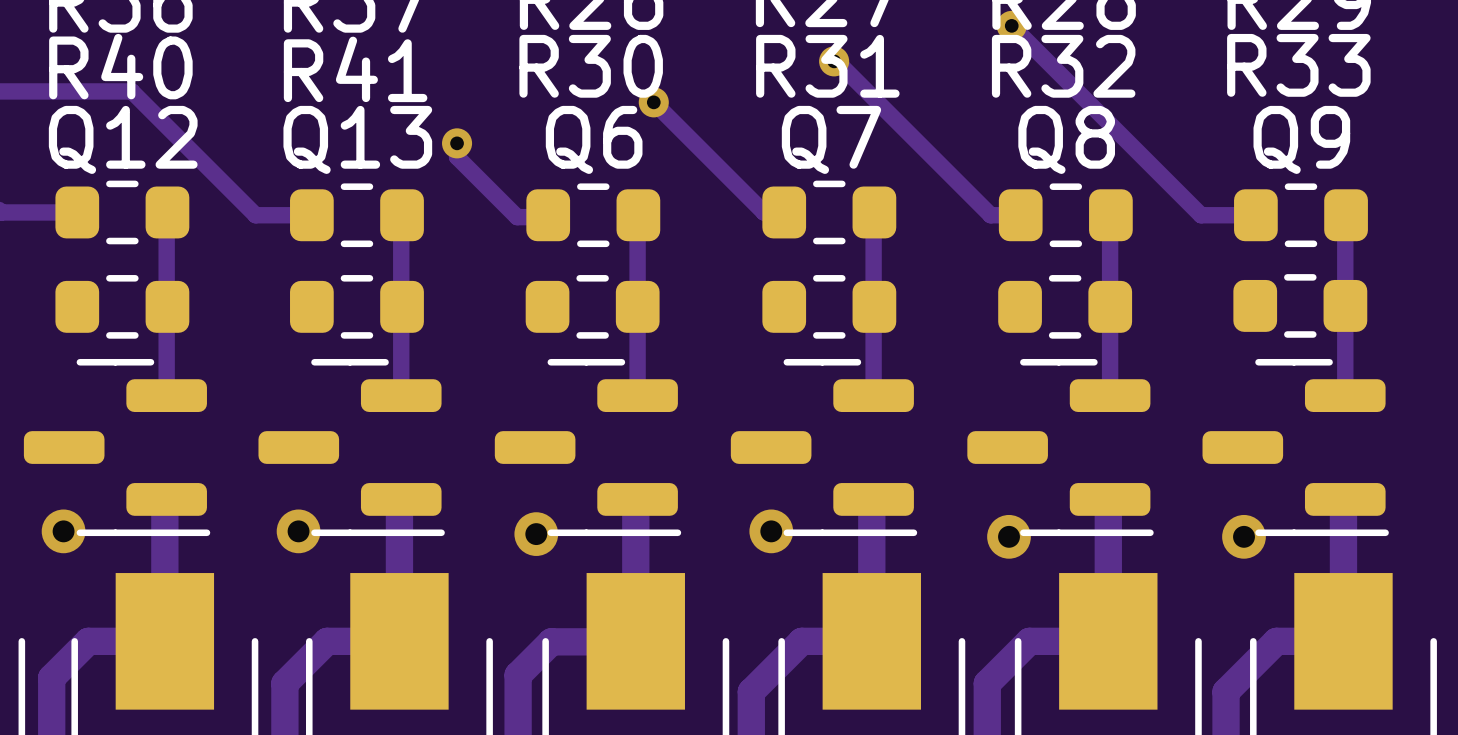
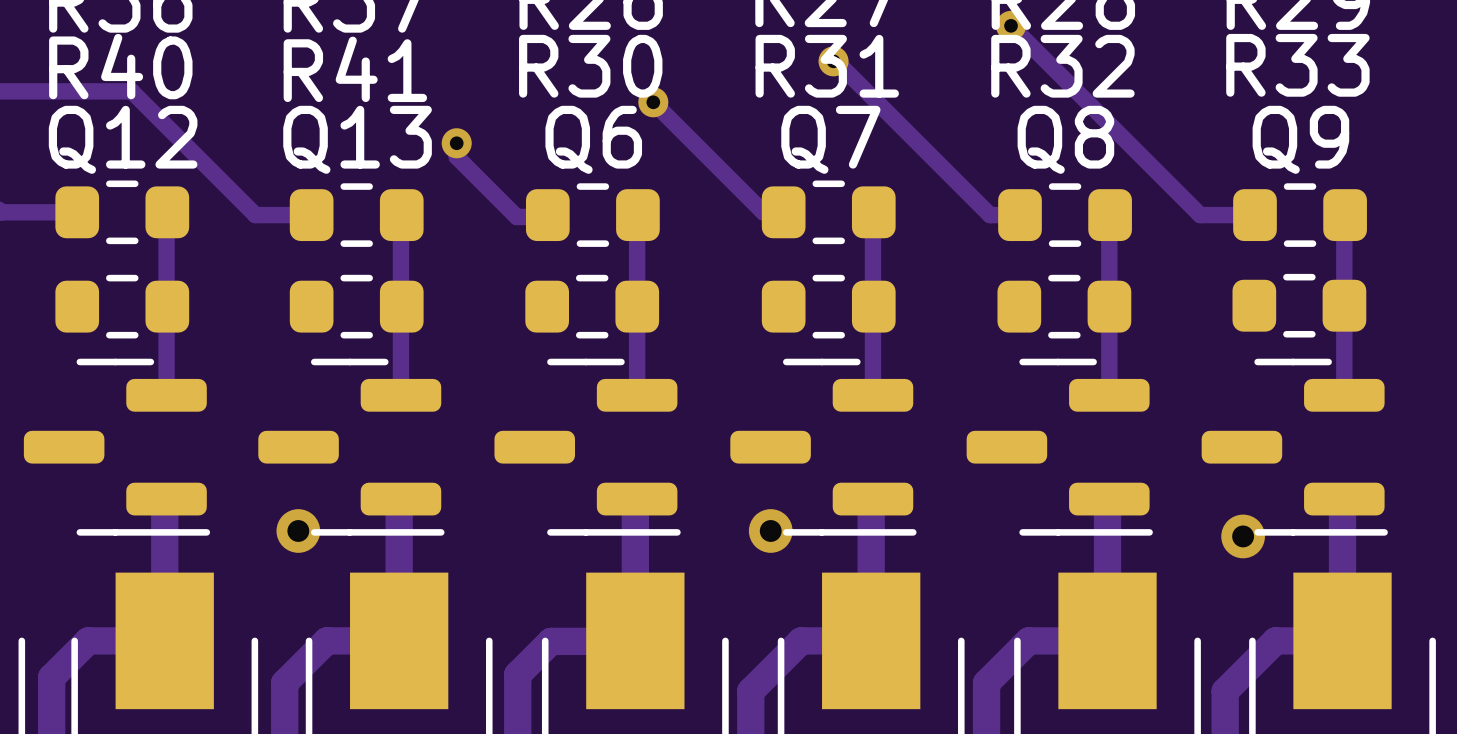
via: (63, 531) -> none
via: (536, 534) -> none
via: (1009, 536) -> none

